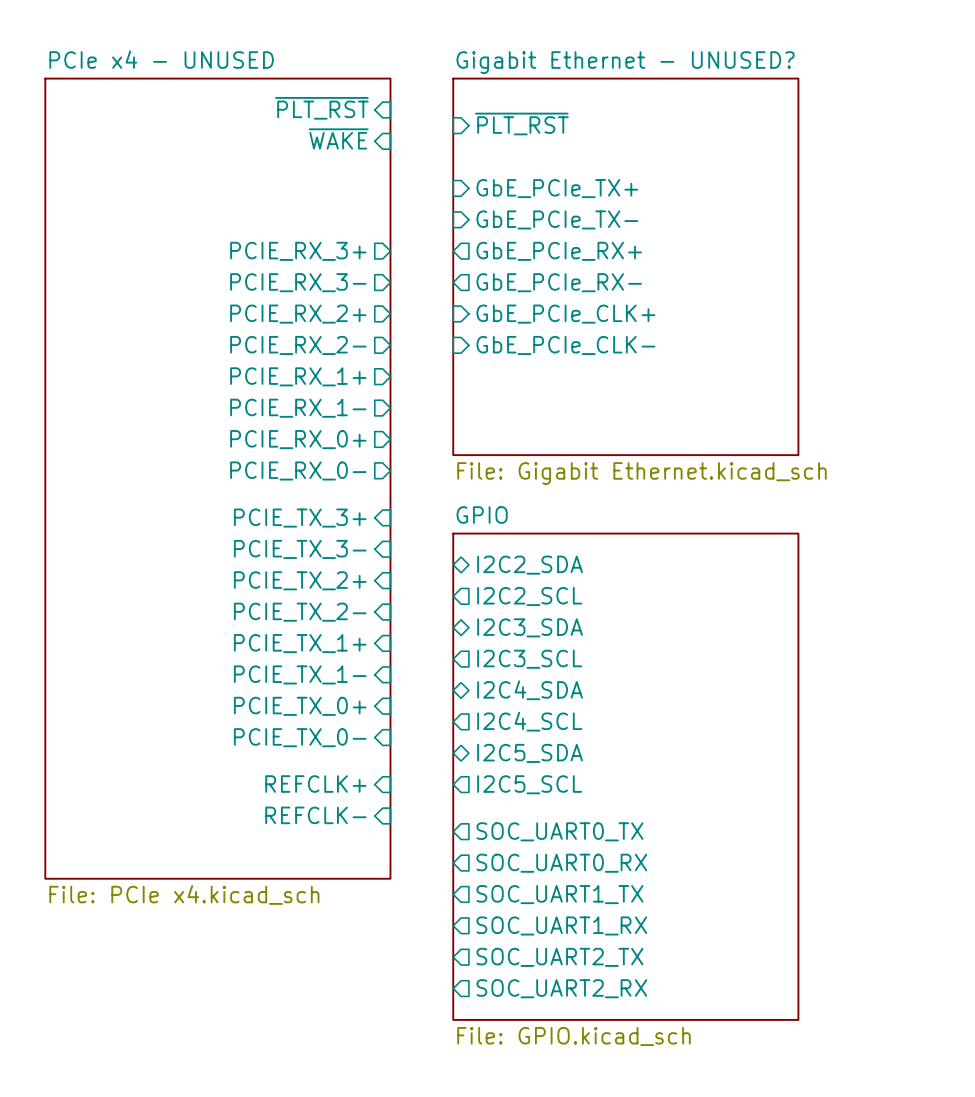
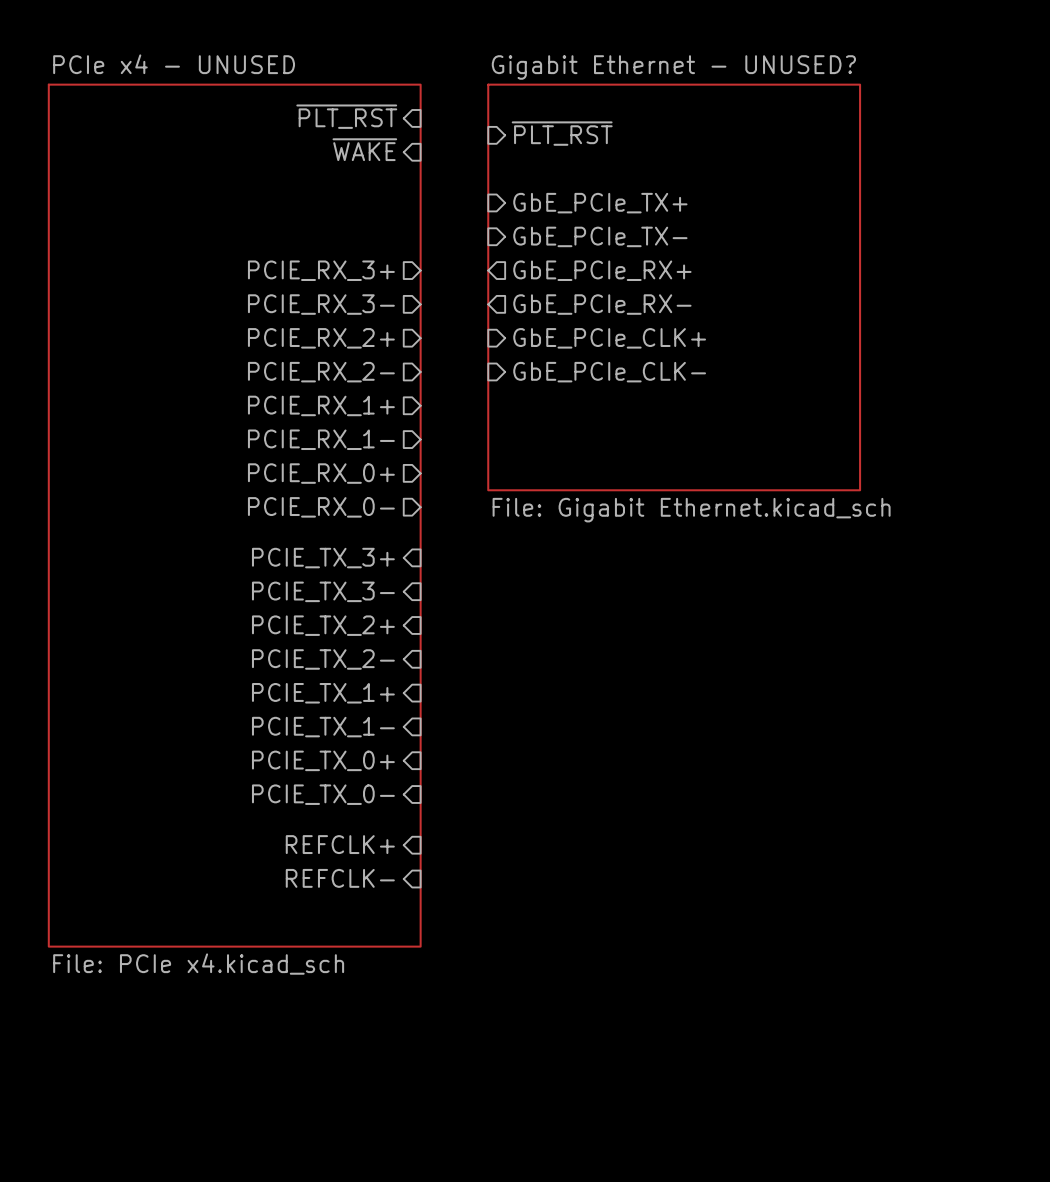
sheet pin: I2C2_SDA (530, 565) -> none
sheet pin: I2C2_SCL (529, 596) -> none
sheet pin: I2C3_SDA (530, 627) -> none
sheet pin: I2C3_SCL (529, 659) -> none
sheet pin: I2C4_SDA (530, 690) -> none
sheet pin: I2C4_SCL (529, 721) -> none
sheet pin: I2C5_SDA (530, 753) -> none
sheet GPIO: File: GPIO.kicad_sch (625, 776) -> none
sheet pin: I2C5_SCL (529, 784) -> none
sheet pin: SOC_UART0_TX (559, 831) -> none
sheet pin: SOC_UART0_RX (561, 863) -> none
sheet pin: SOC_UART1_TX (559, 894) -> none
sheet pin: SOC_UART1_RX (561, 925) -> none
sheet pin: SOC_UART2_TX (559, 957) -> none
sheet pin: SOC_UART2_RX (561, 988) -> none

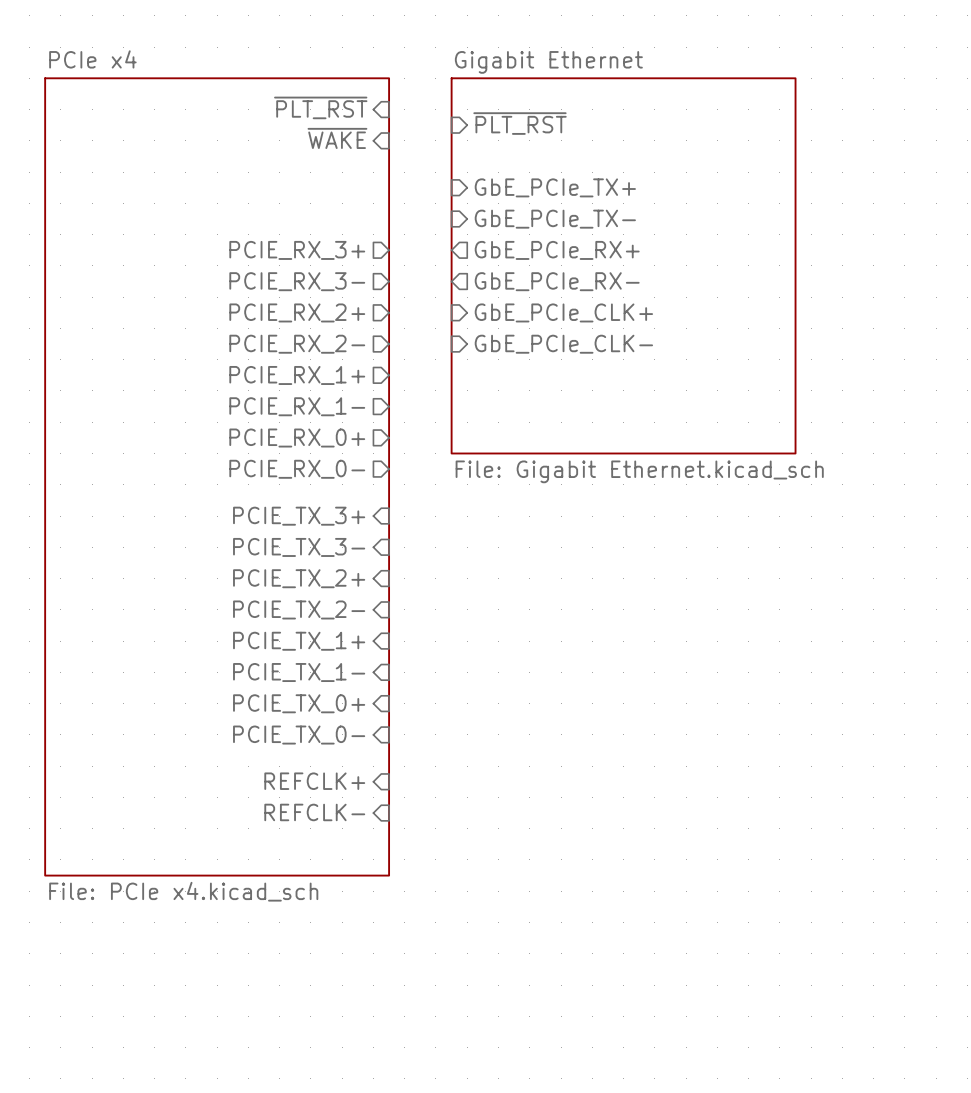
sheet PCIe x4 - UNUSED name: PCIe x4 - UNUSED (174, 64) -> PCIe x4 (92, 59)
sheet Gigabit Ethernet - UNUSED? name: Gigabit Ethernet - UNUSED? (673, 67) -> Gigabit Ethernet (548, 62)

